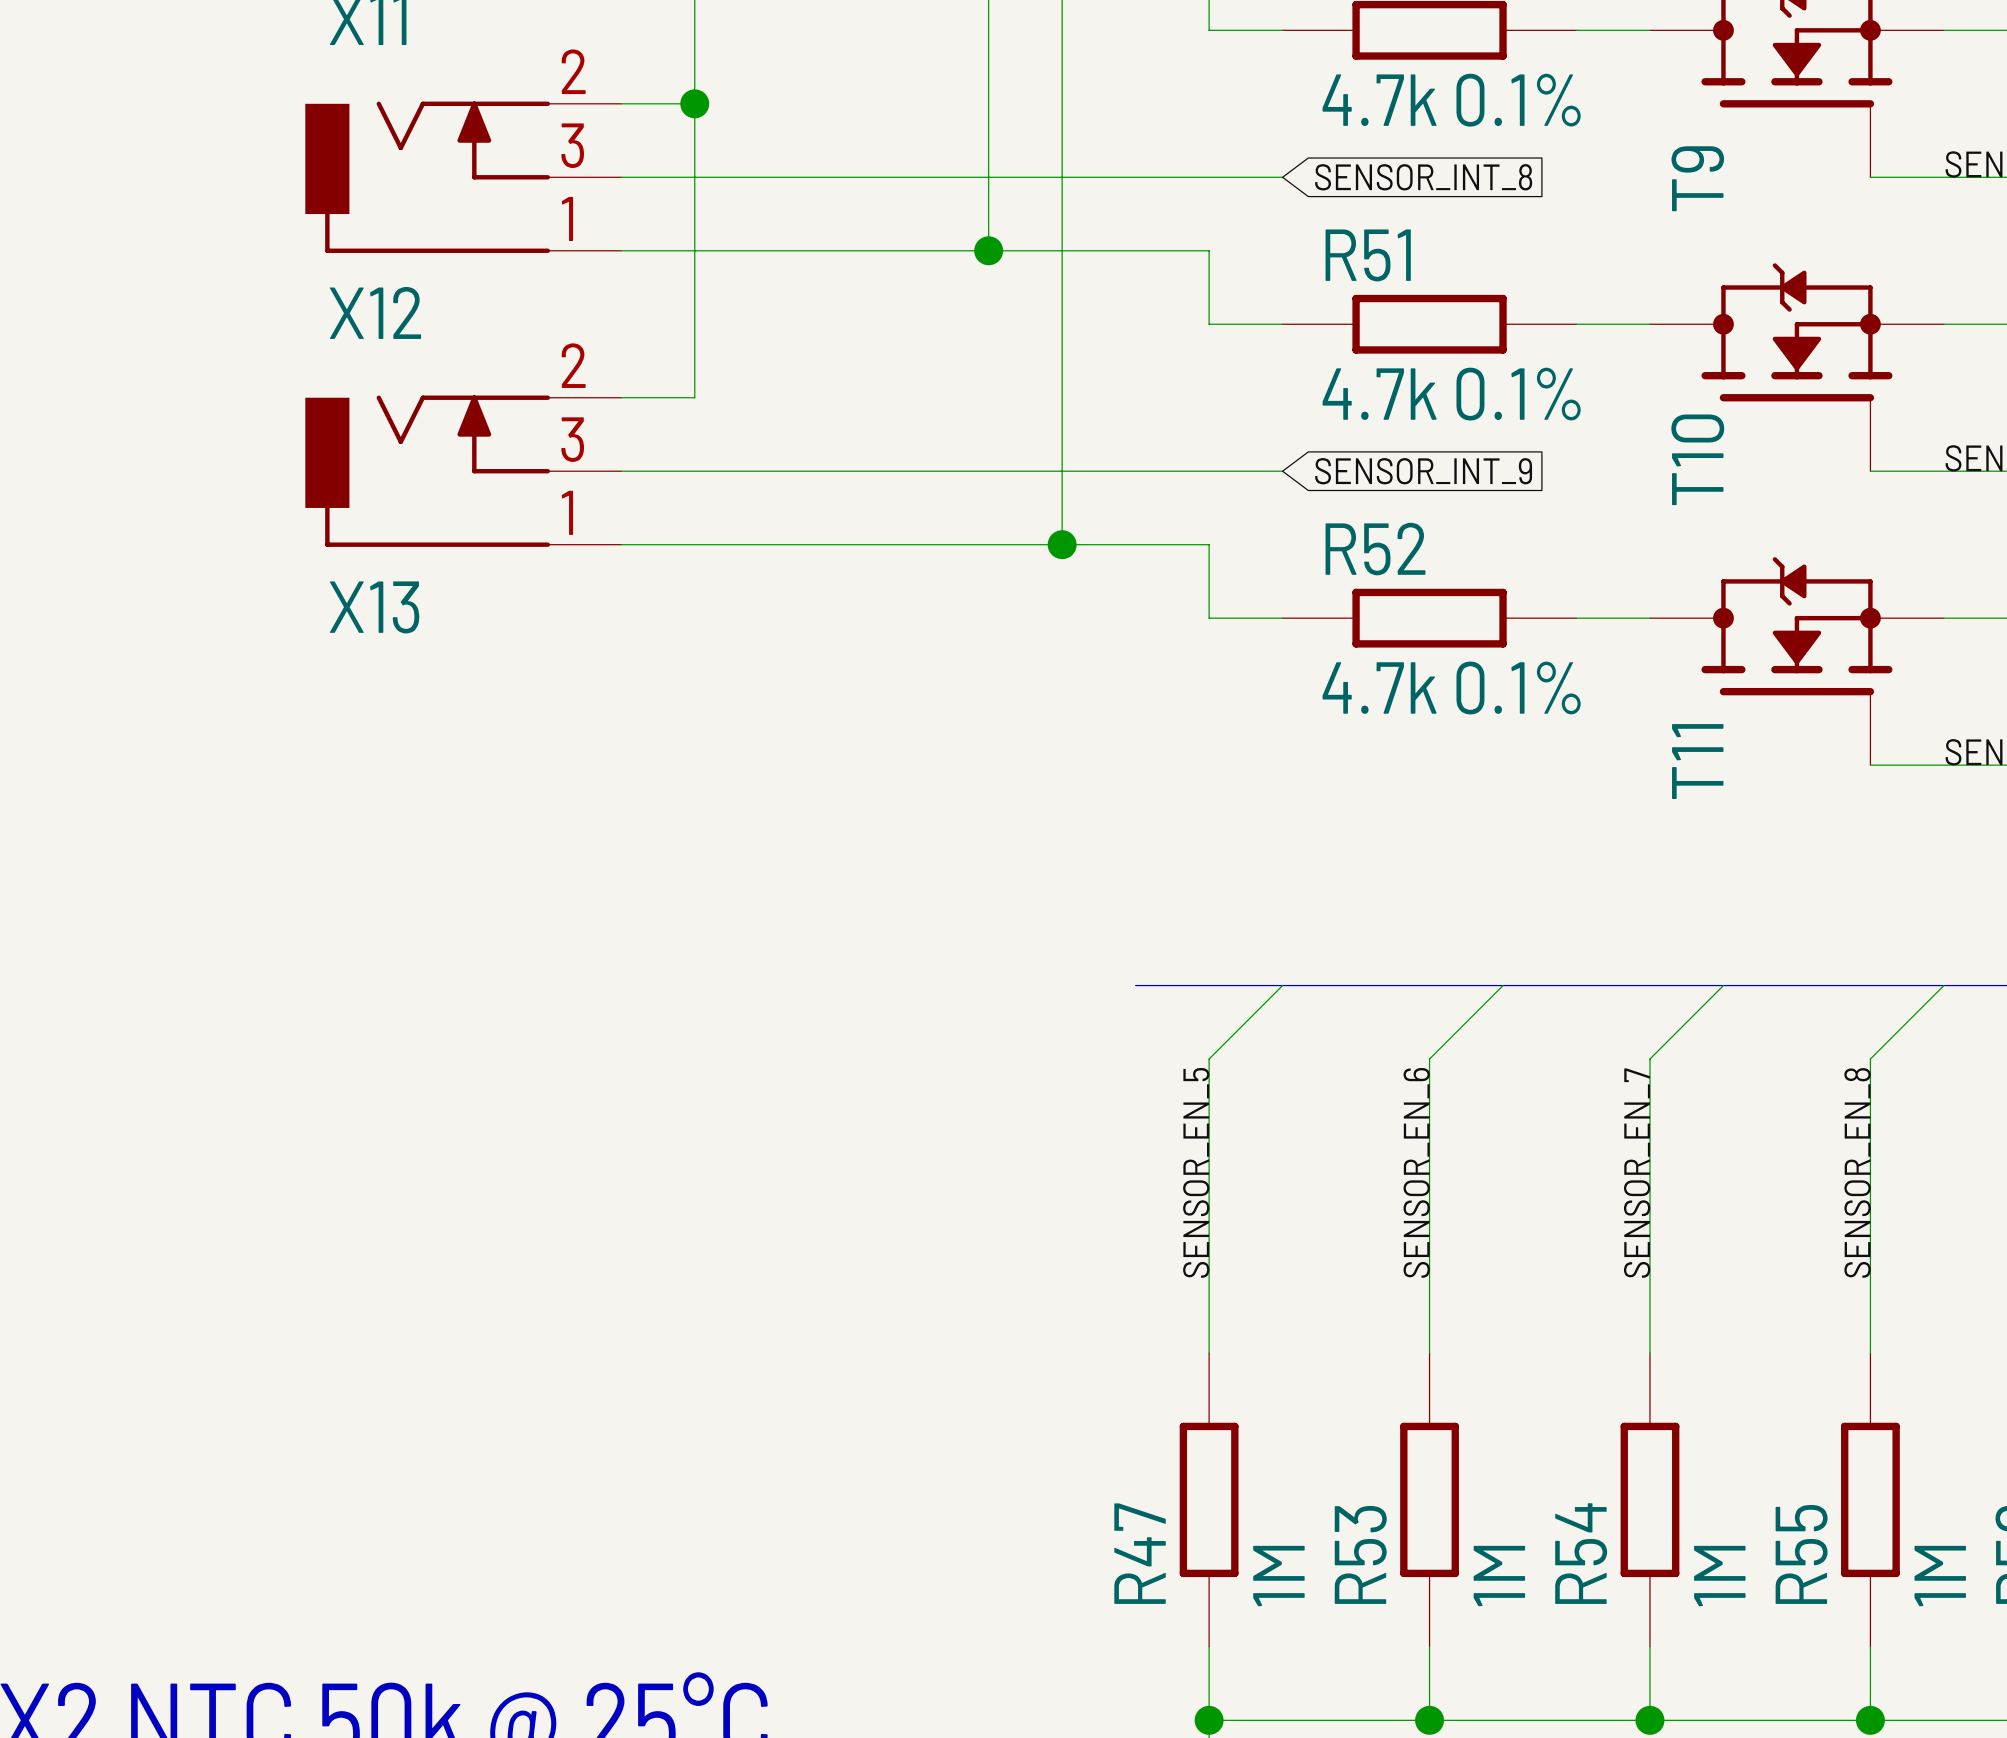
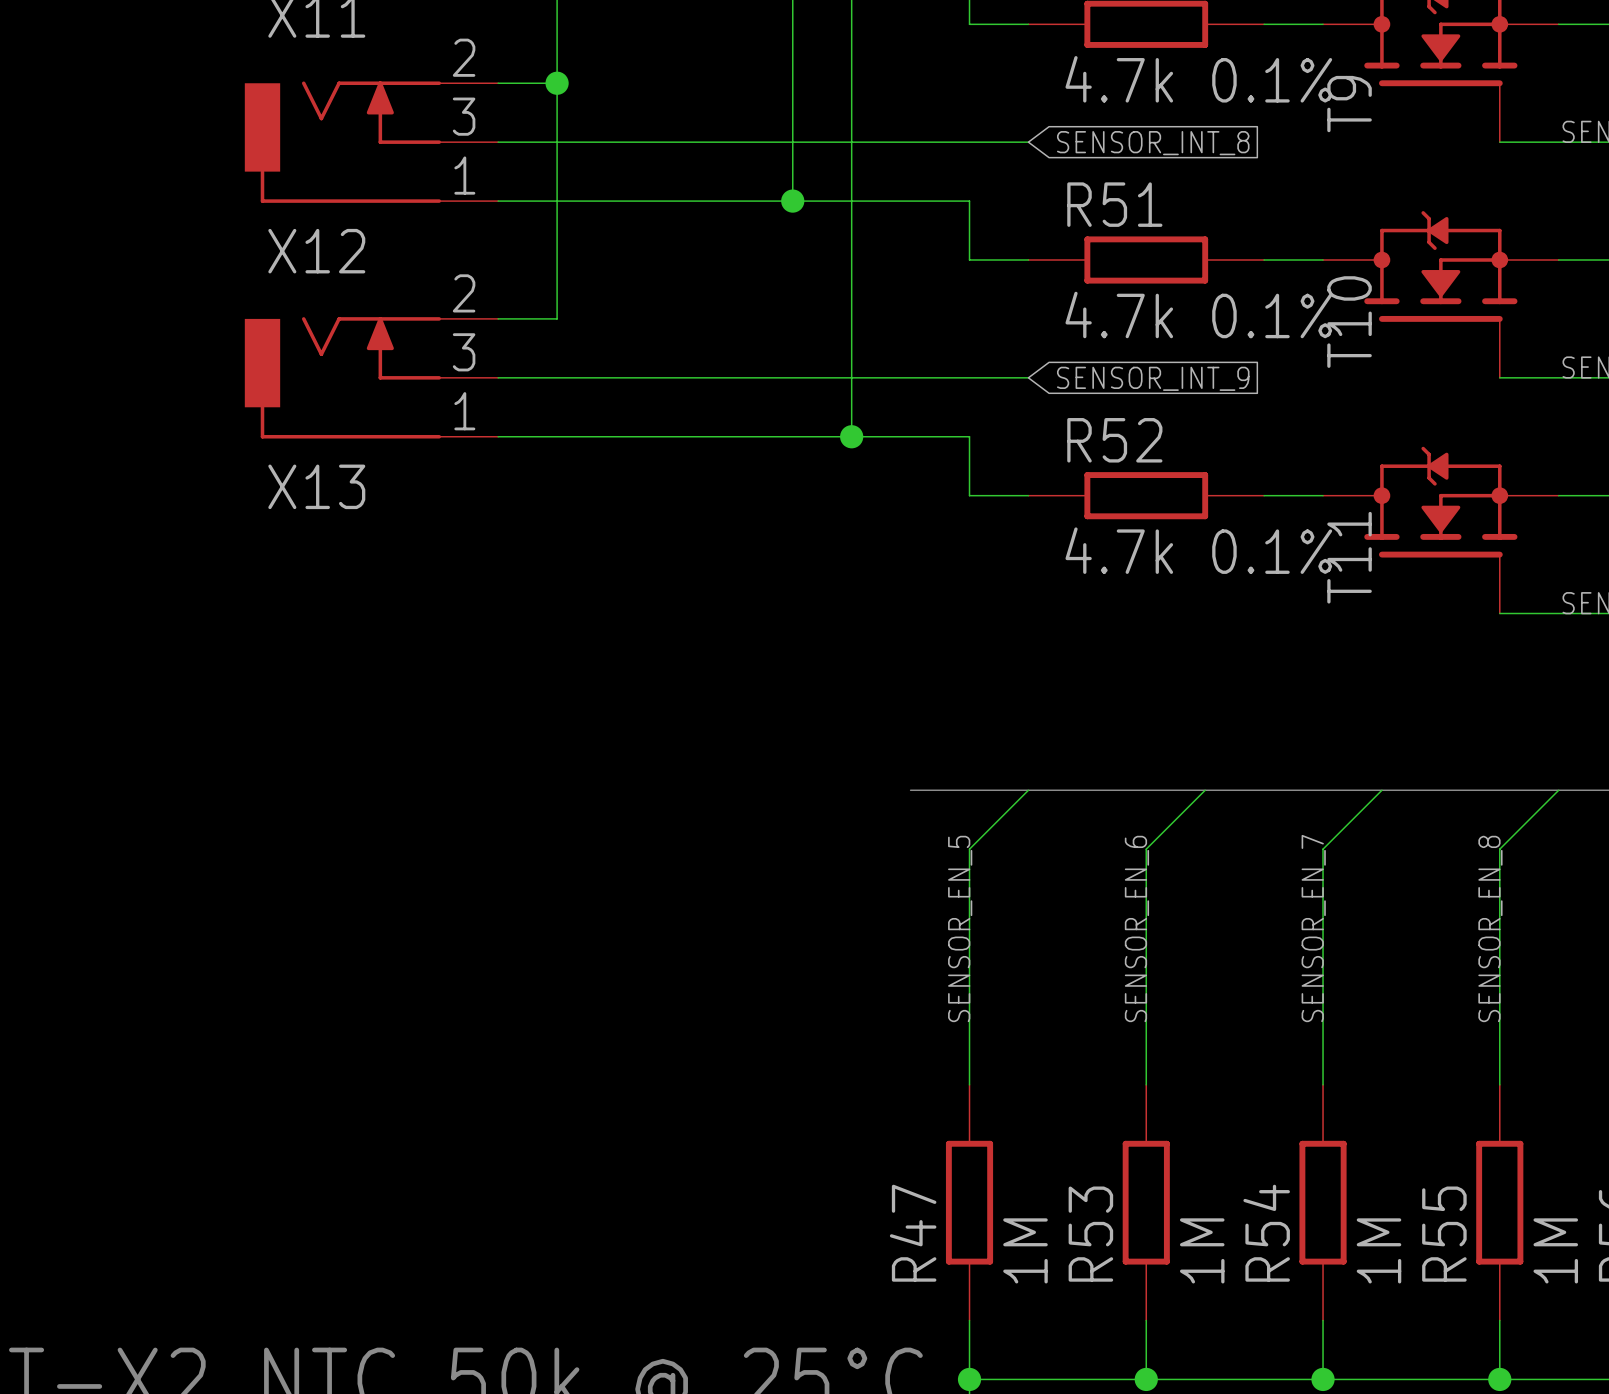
T9 name position: T9 (1697, 178) -> T9 (1349, 104)
T10 name position: T10 (1697, 459) -> T10 (1349, 322)
T11 name position: T11 (1697, 761) -> T11 (1349, 557)

